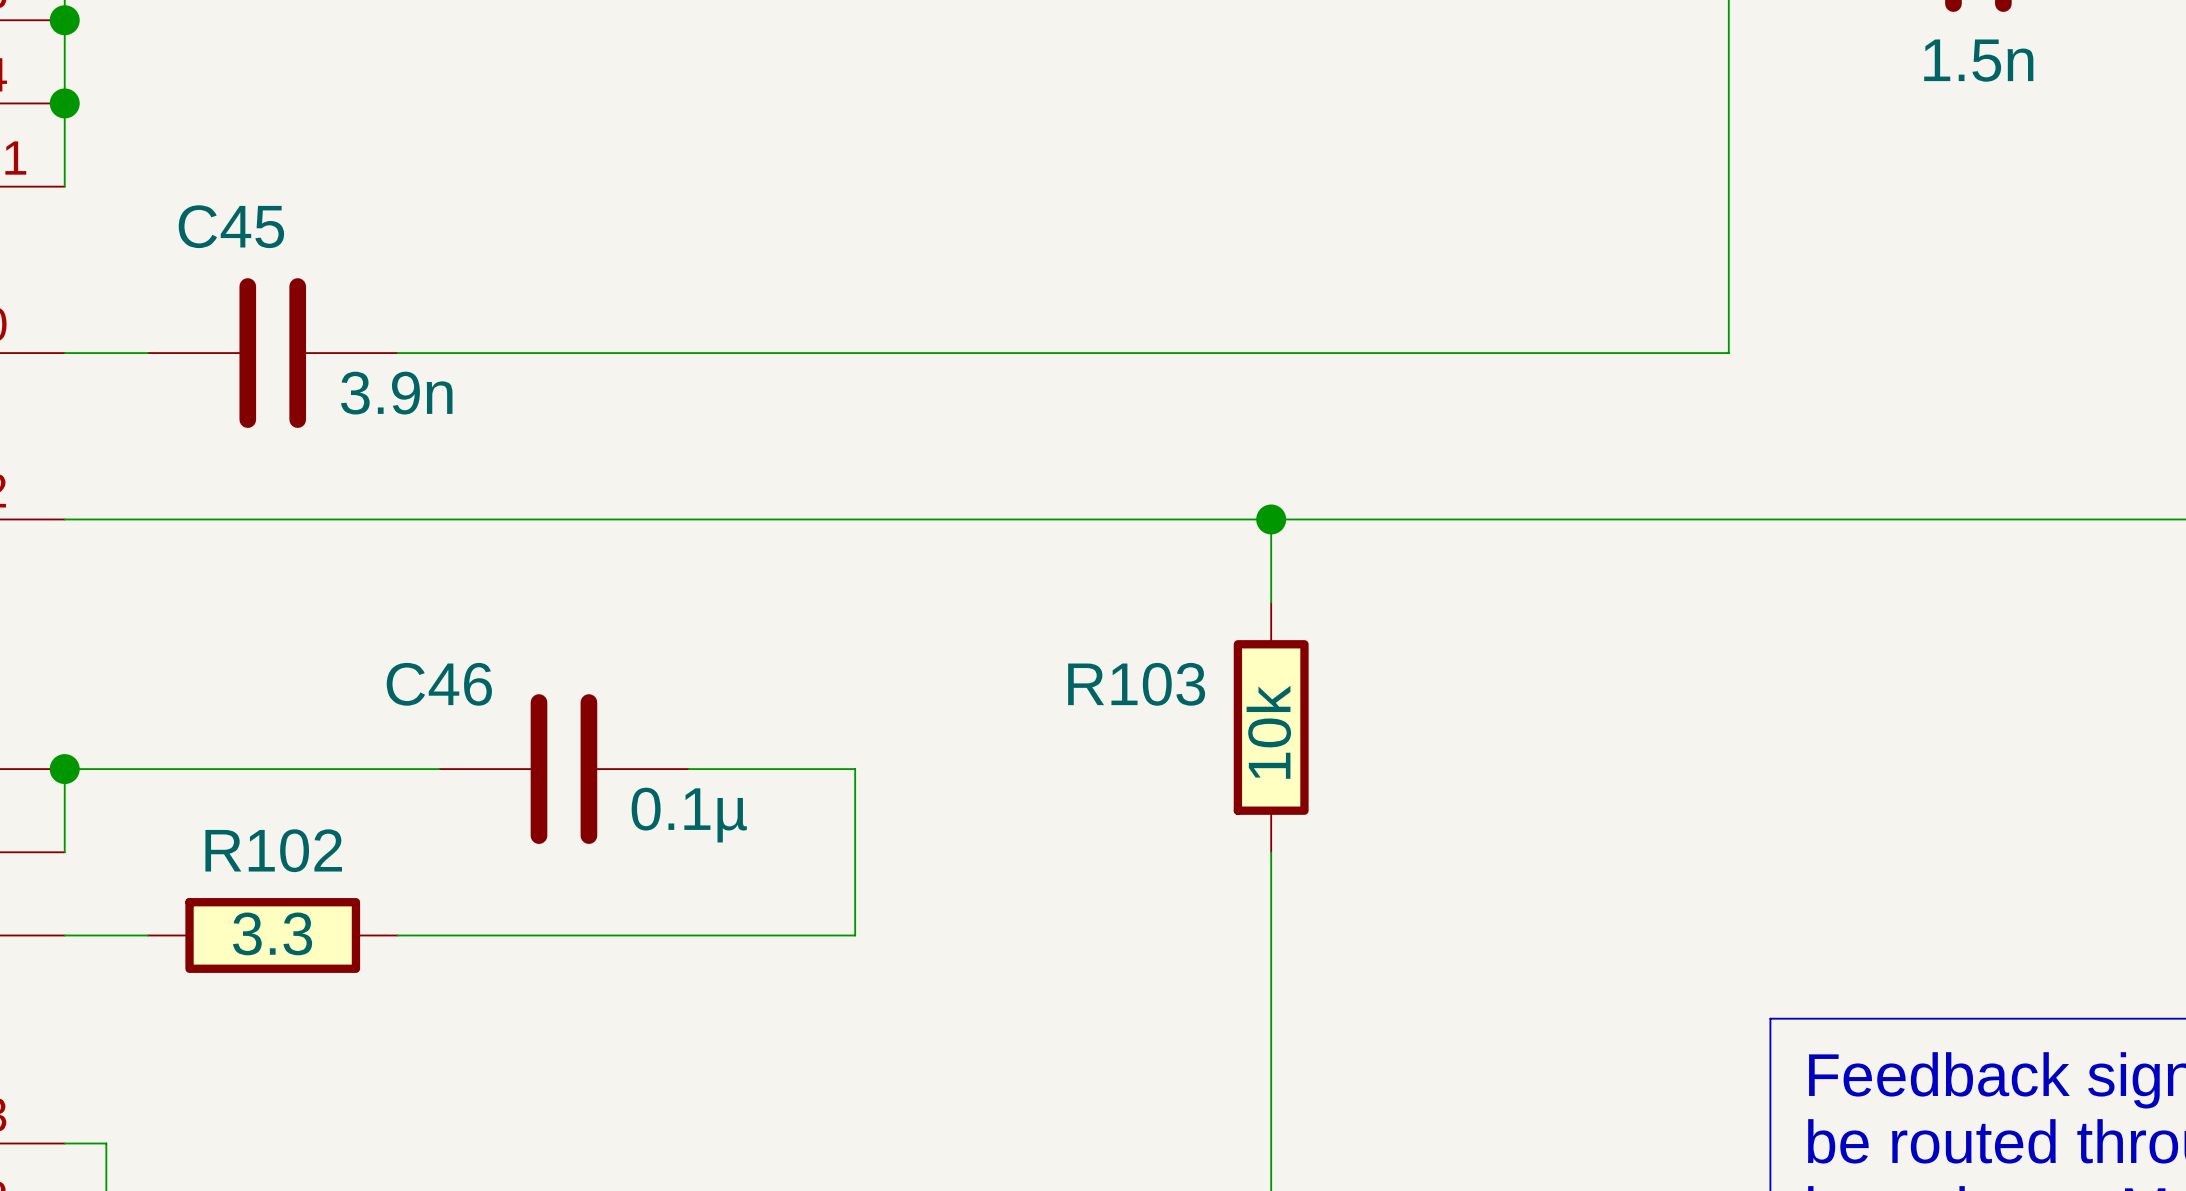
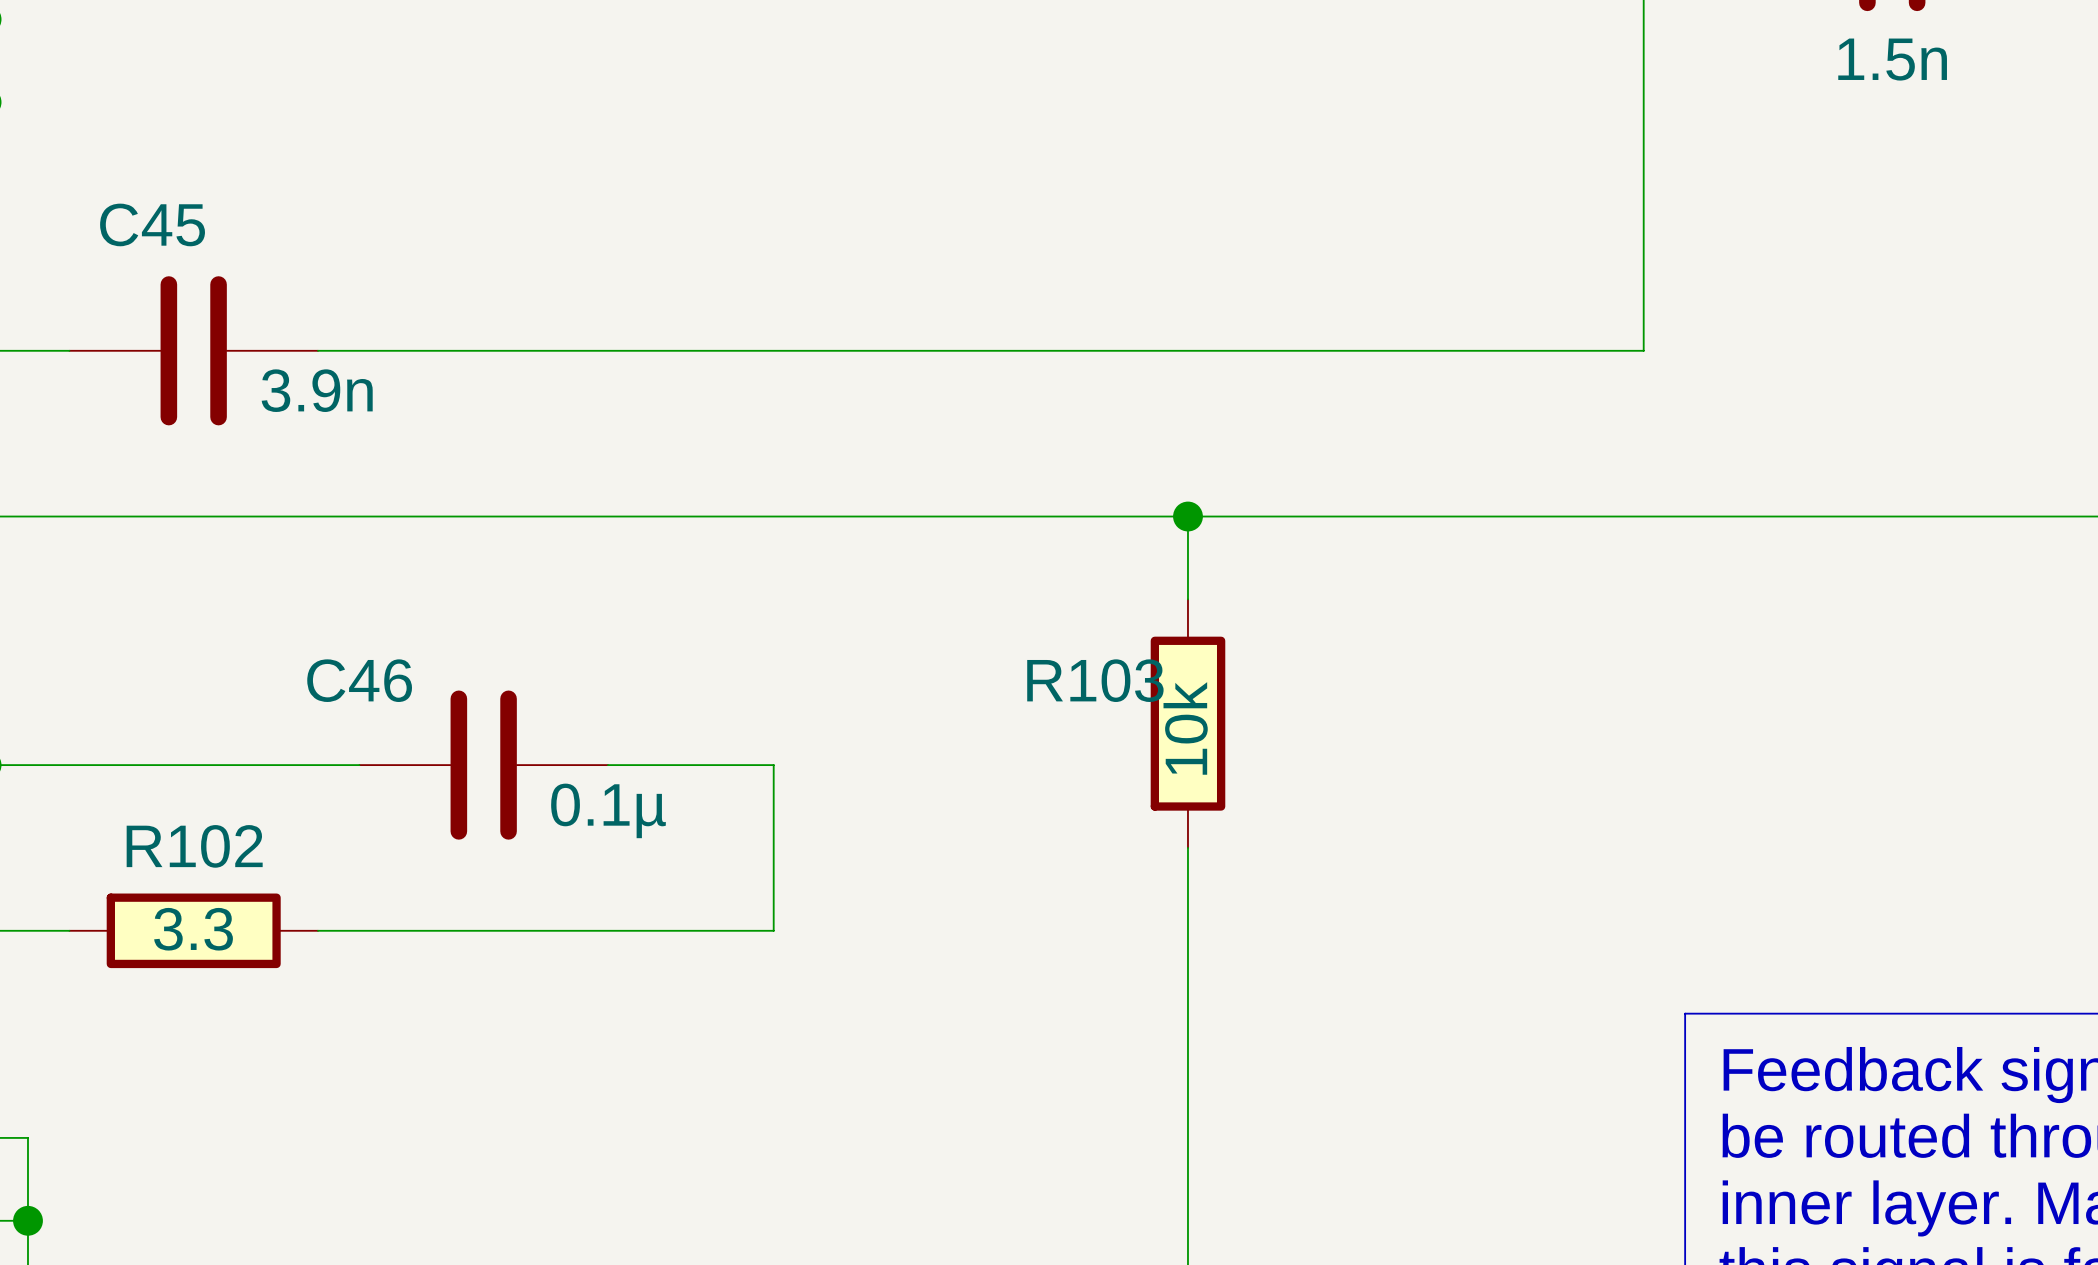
R103 name position: R103 (1136, 684) -> R103 (1095, 680)

